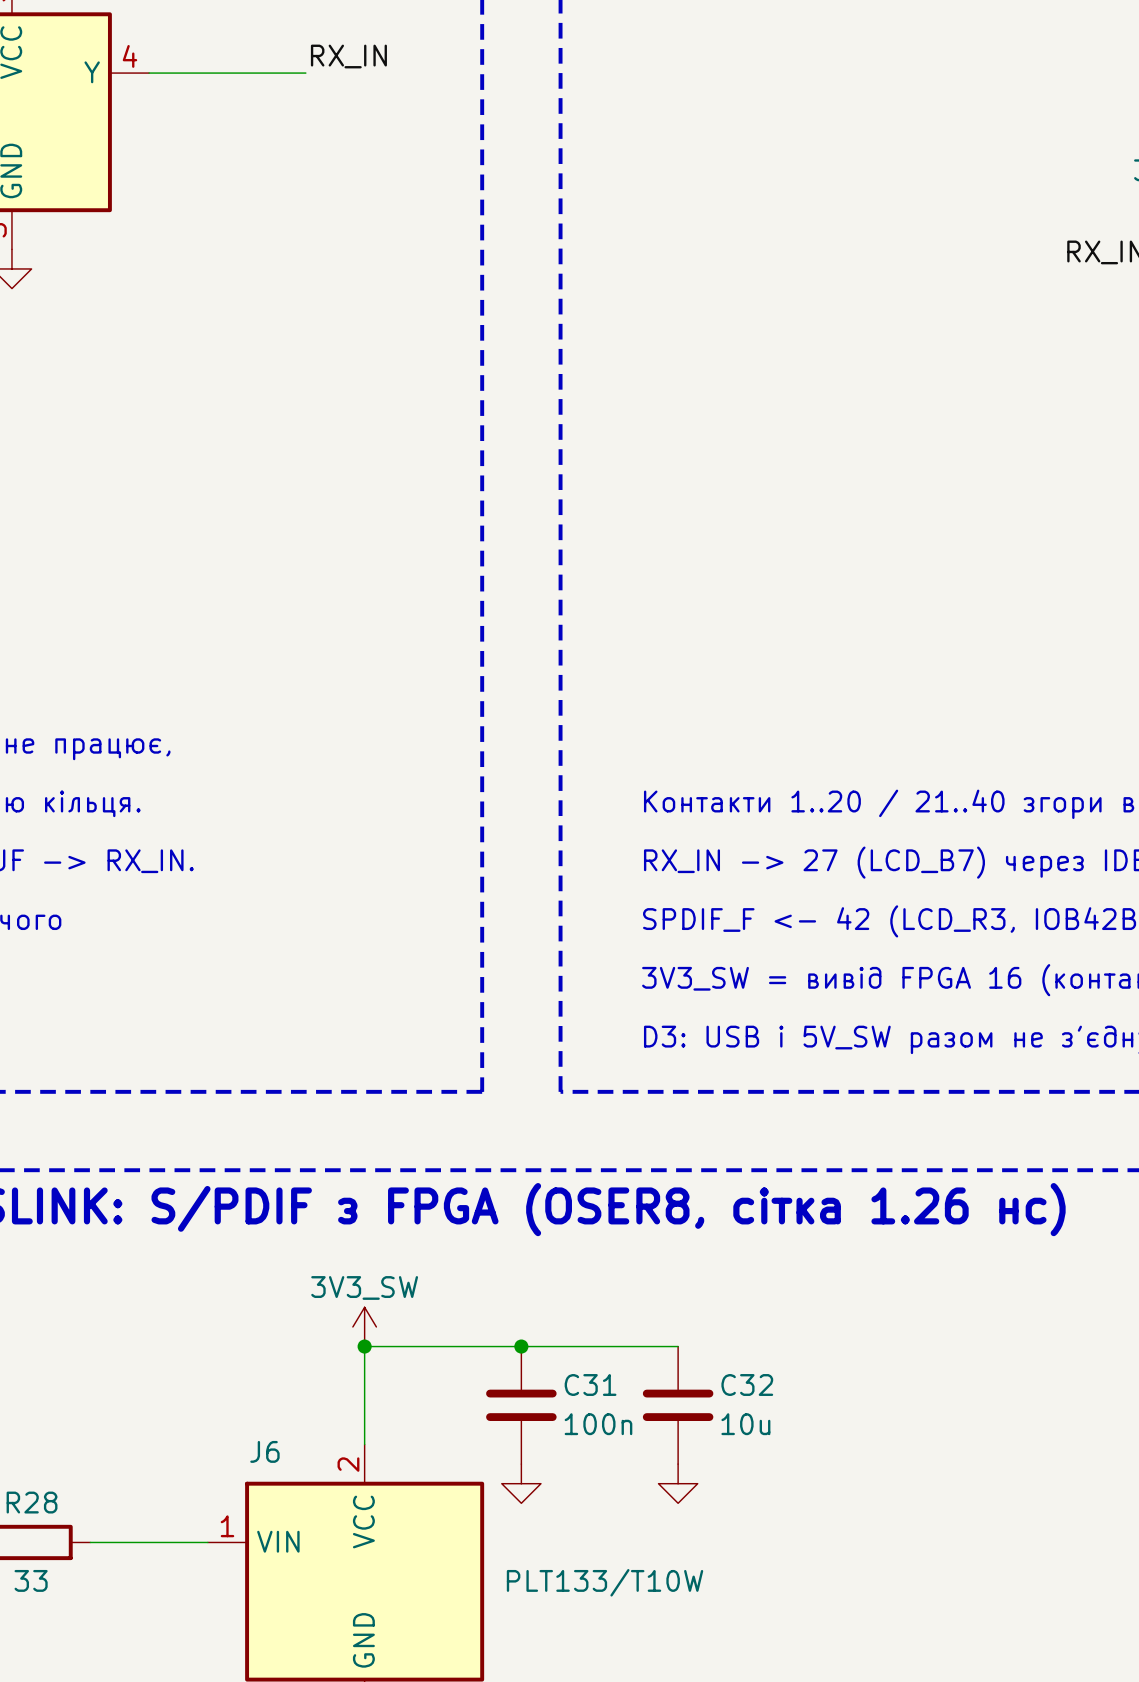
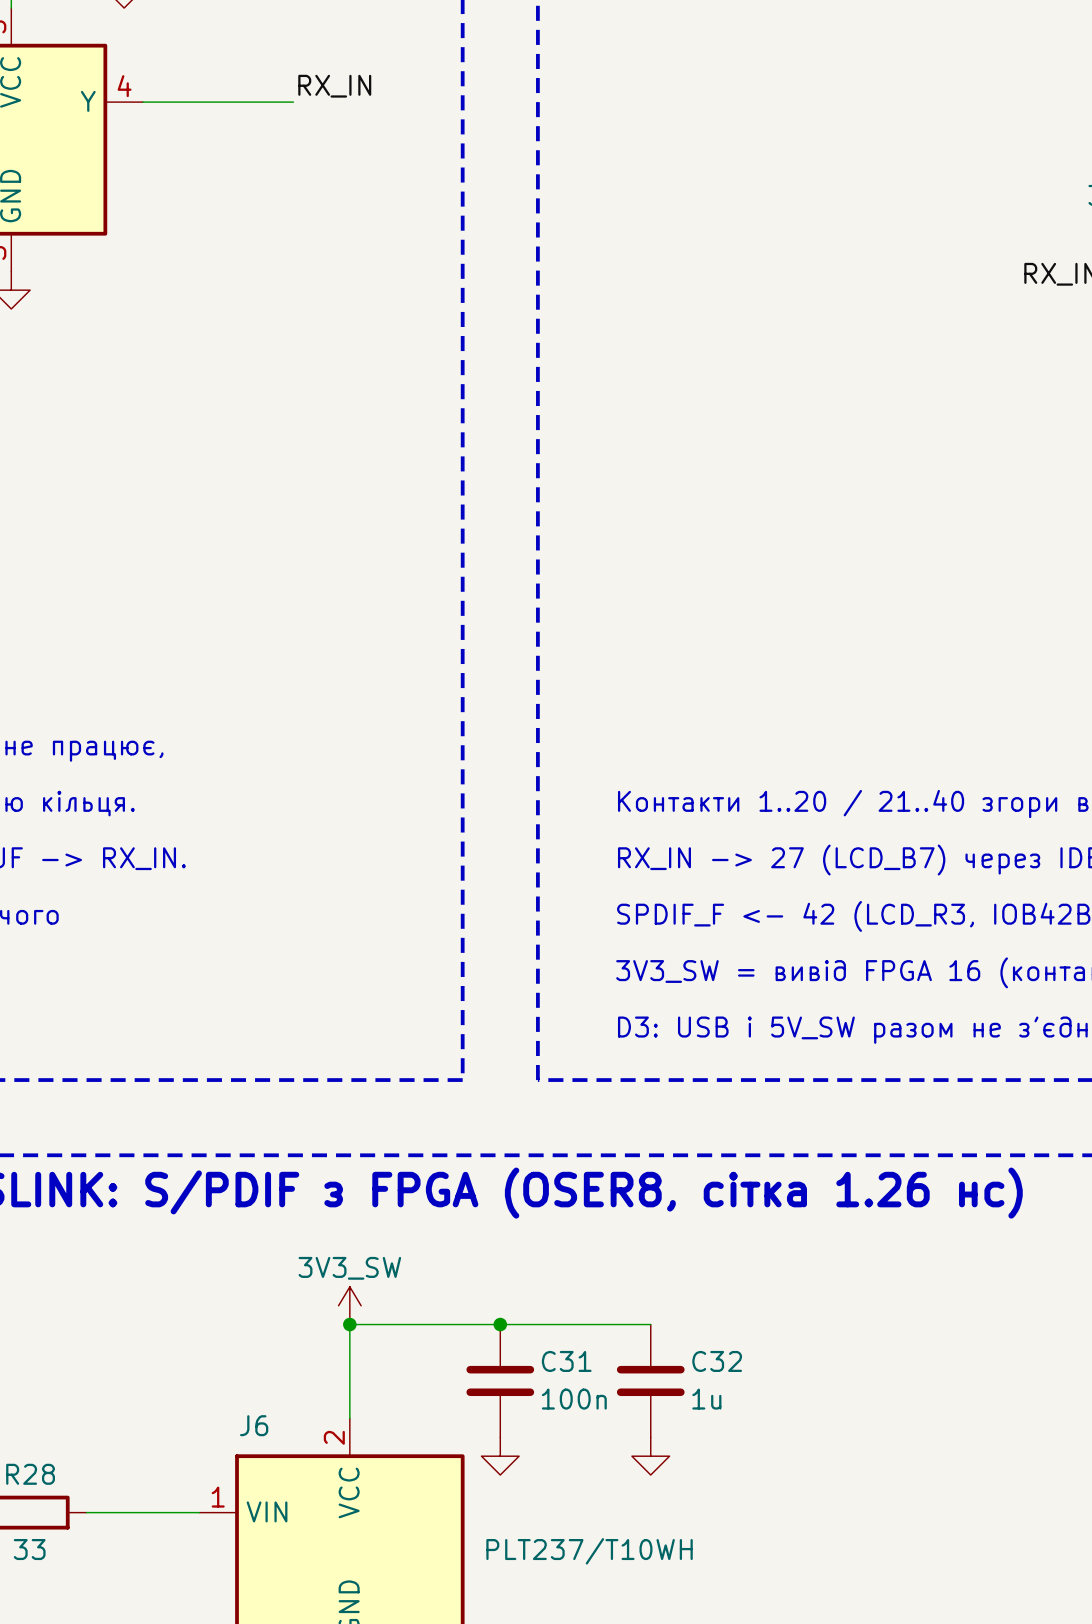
C32 value: 10u (745, 1424) -> 1u (706, 1399)
J6 value: PLT133/T10W (605, 1582) -> PLT237/T10WH (589, 1551)

